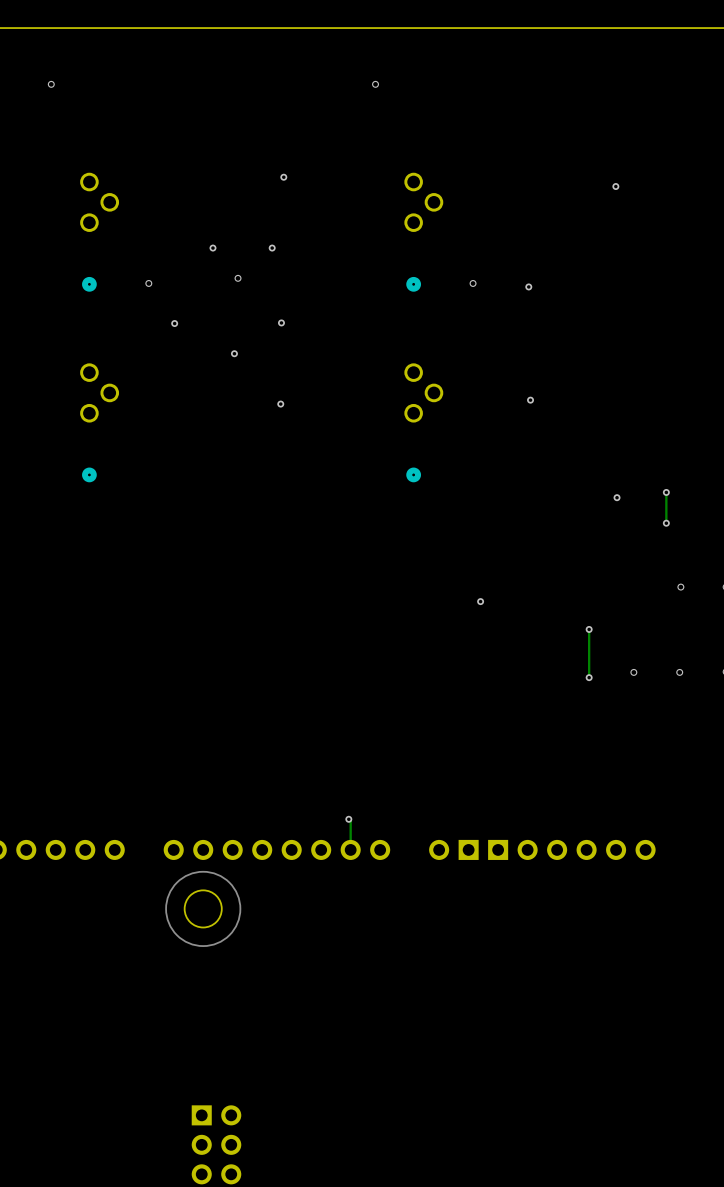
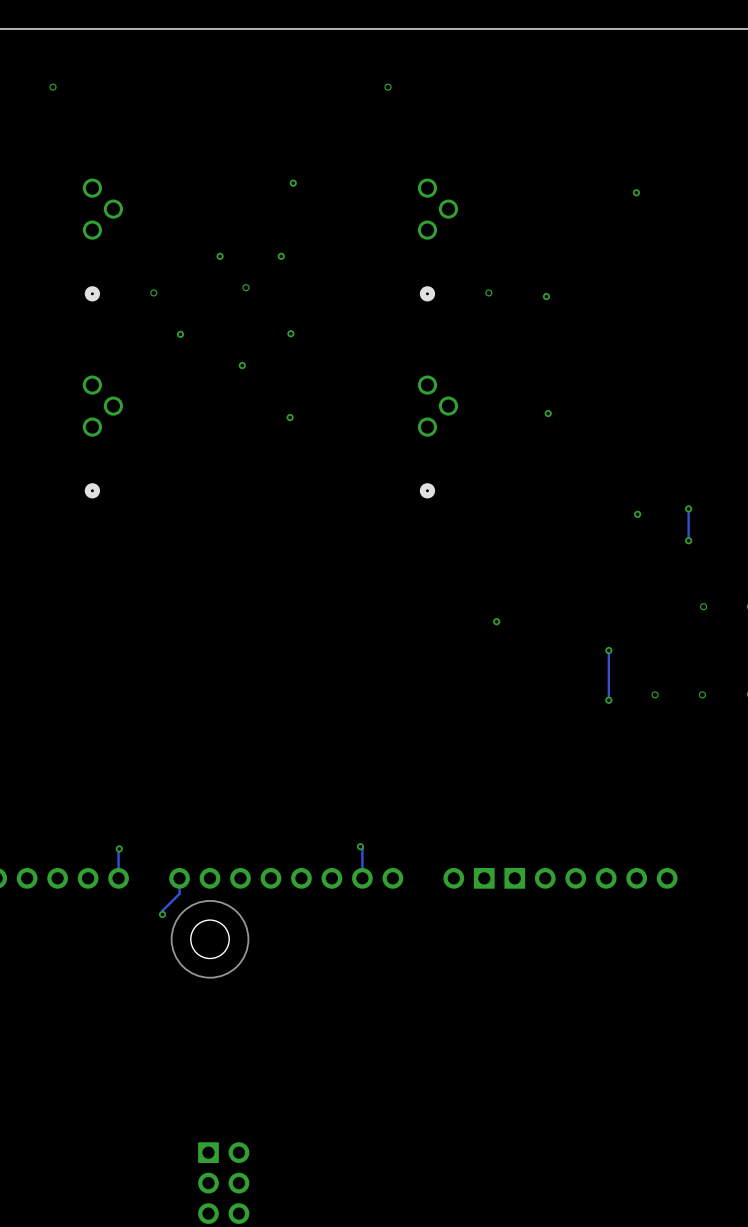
track: none -> (119, 848) (118, 878)
via: none -> (119, 848)
track: none -> (179, 878) (179, 893) (162, 910) (162, 914)
via: none -> (162, 914)

